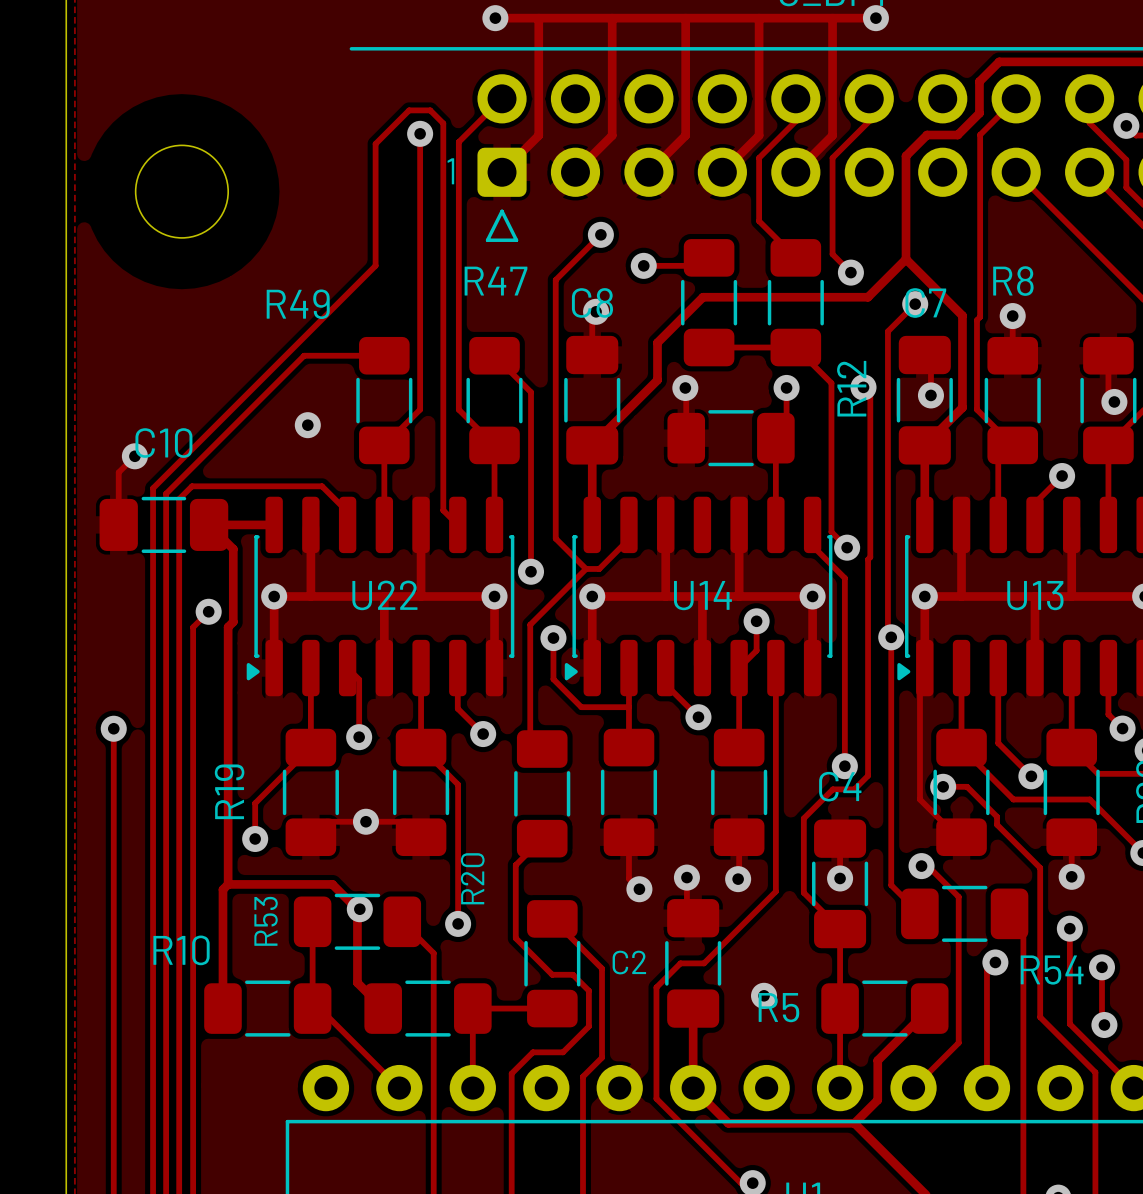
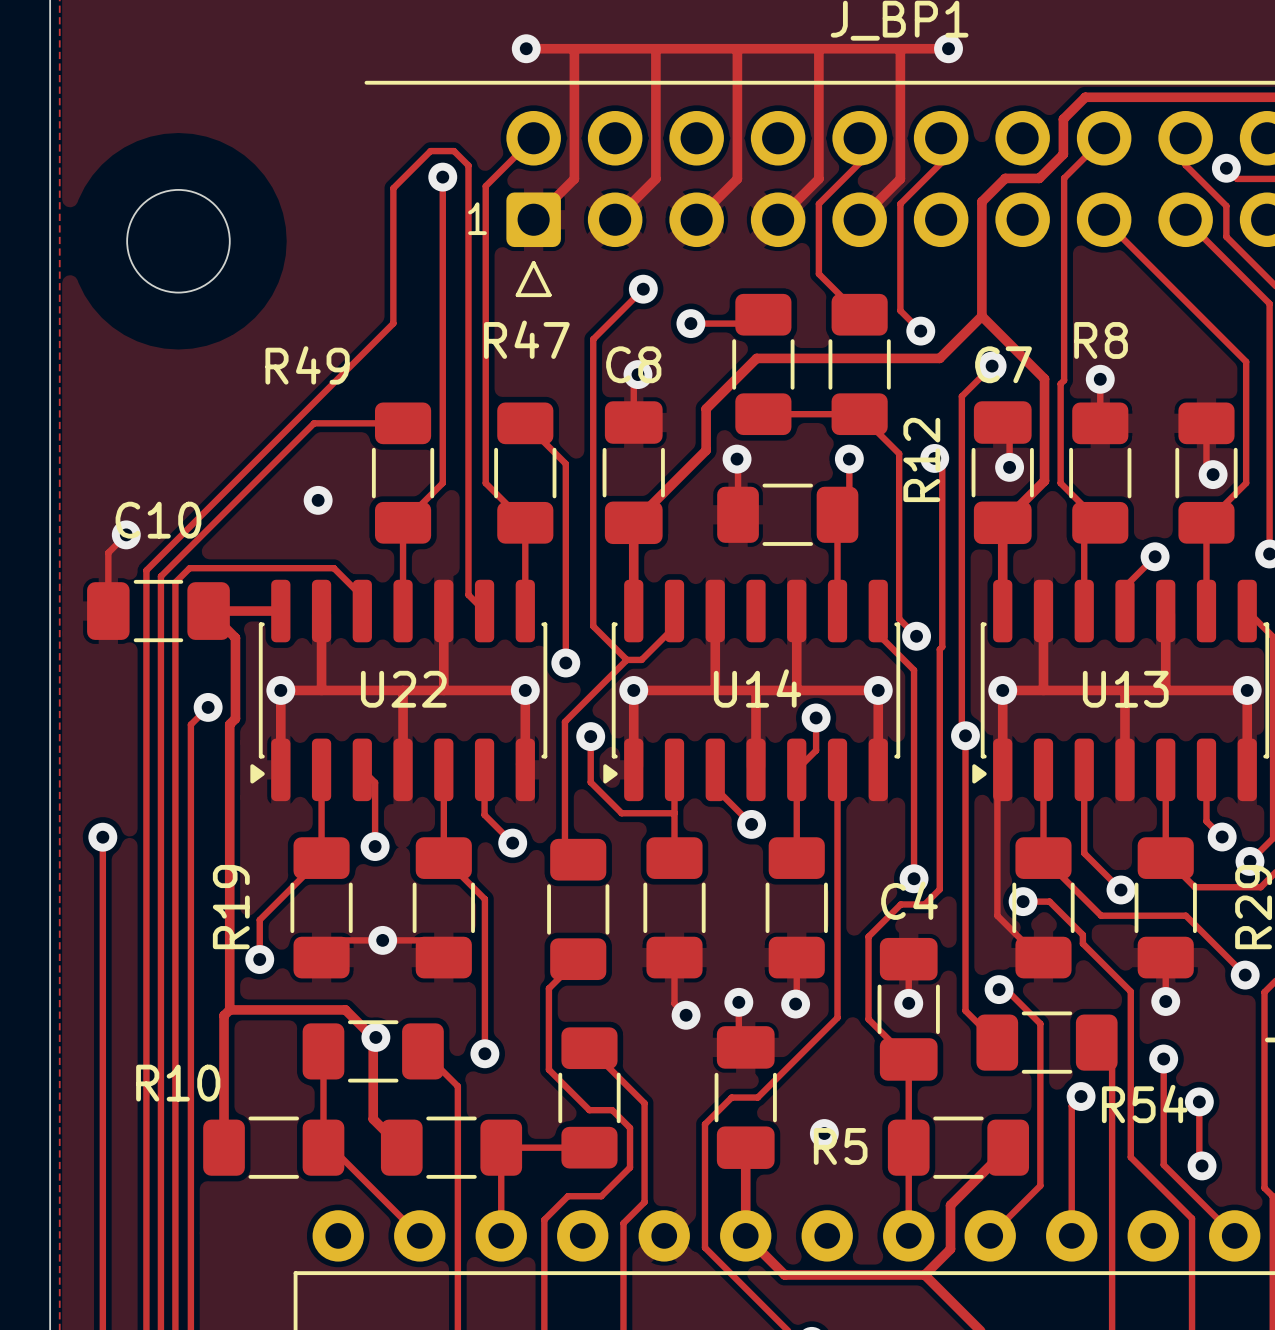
R20 name: R20 (472, 878) -> none
R53 name: R53 (266, 921) -> none
C2 name: C2 (629, 962) -> none

